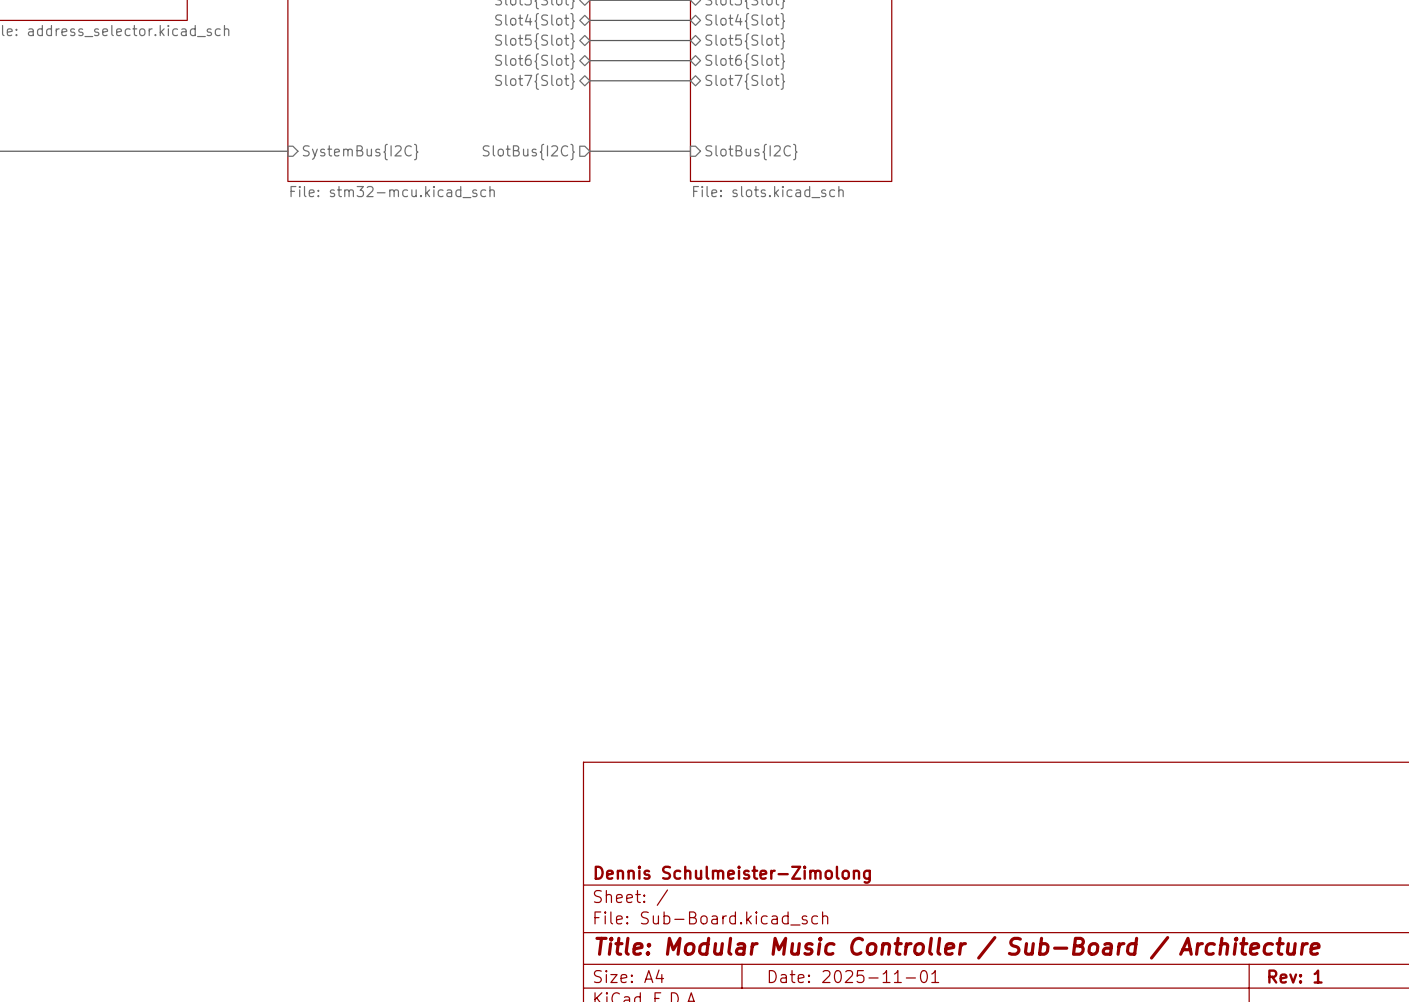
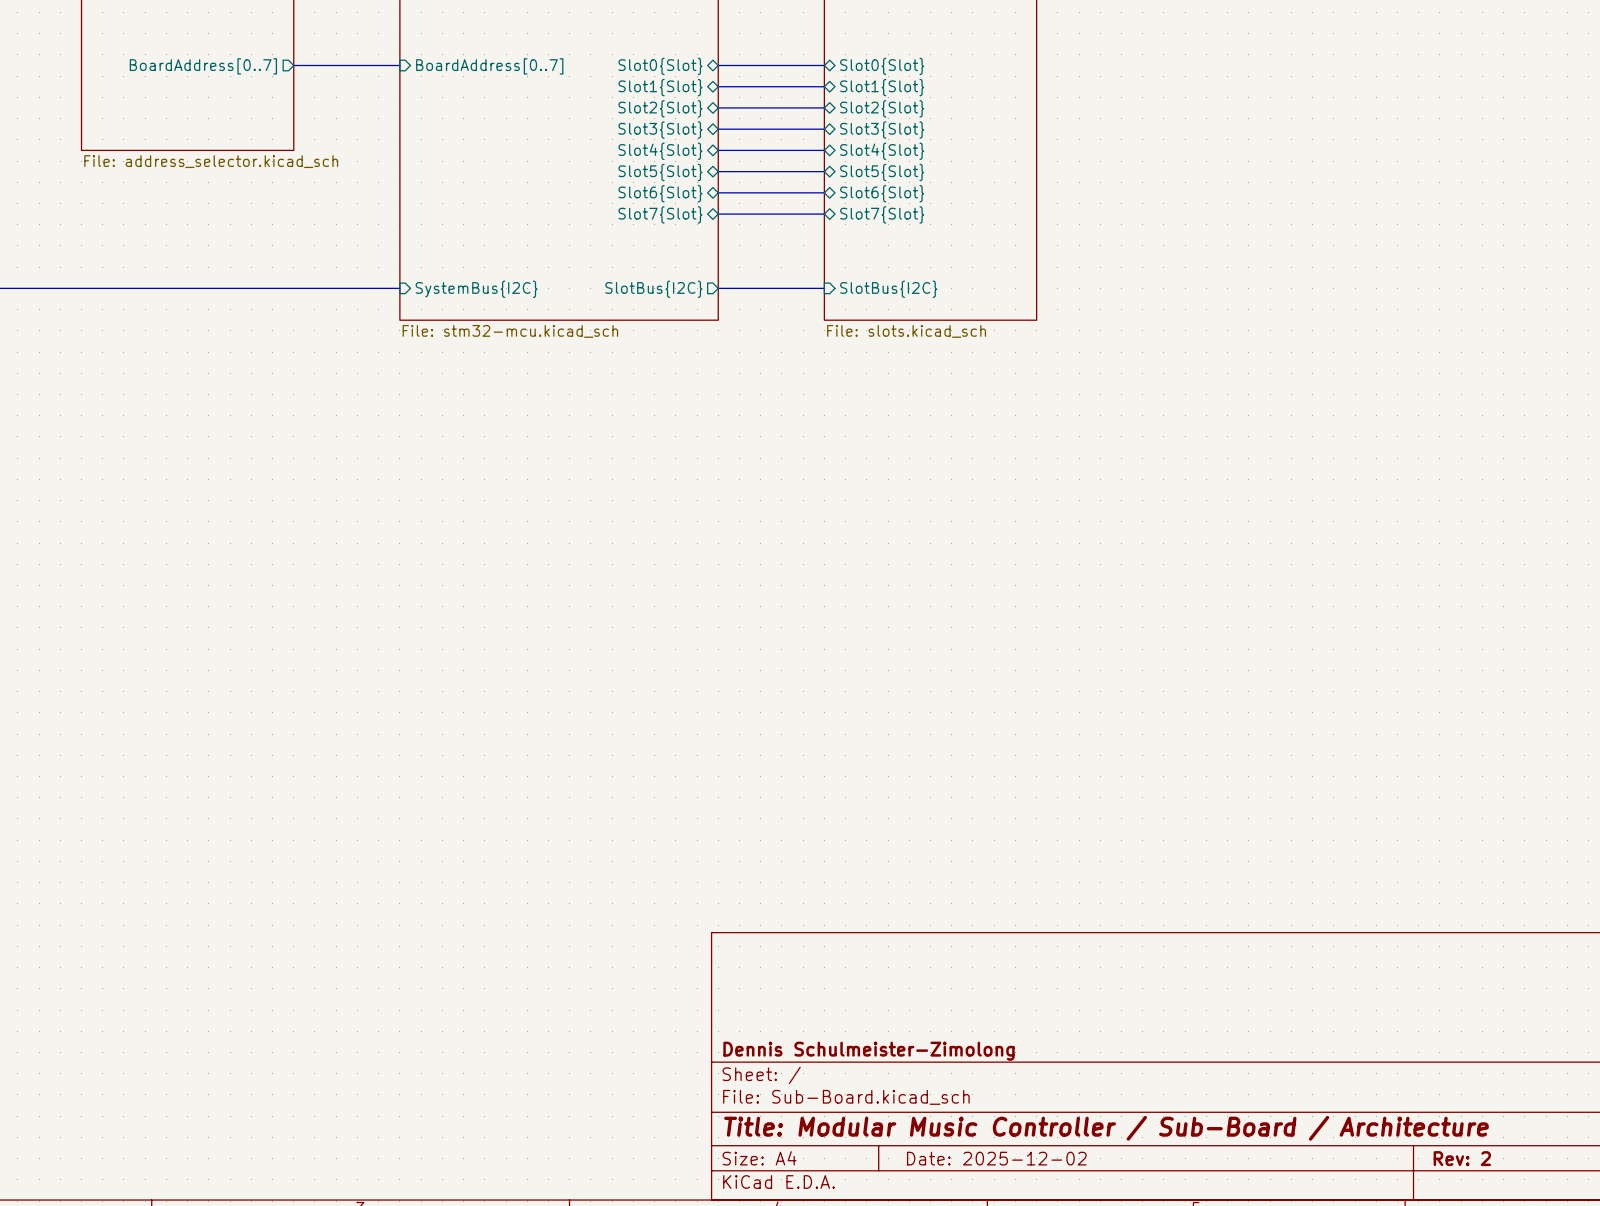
title block: Date: 2025-11-01 (854, 976) -> Date: 2025-12-02 (996, 1158)
title block: Rev: 1 (1295, 976) -> Rev: 2 (1462, 1158)

